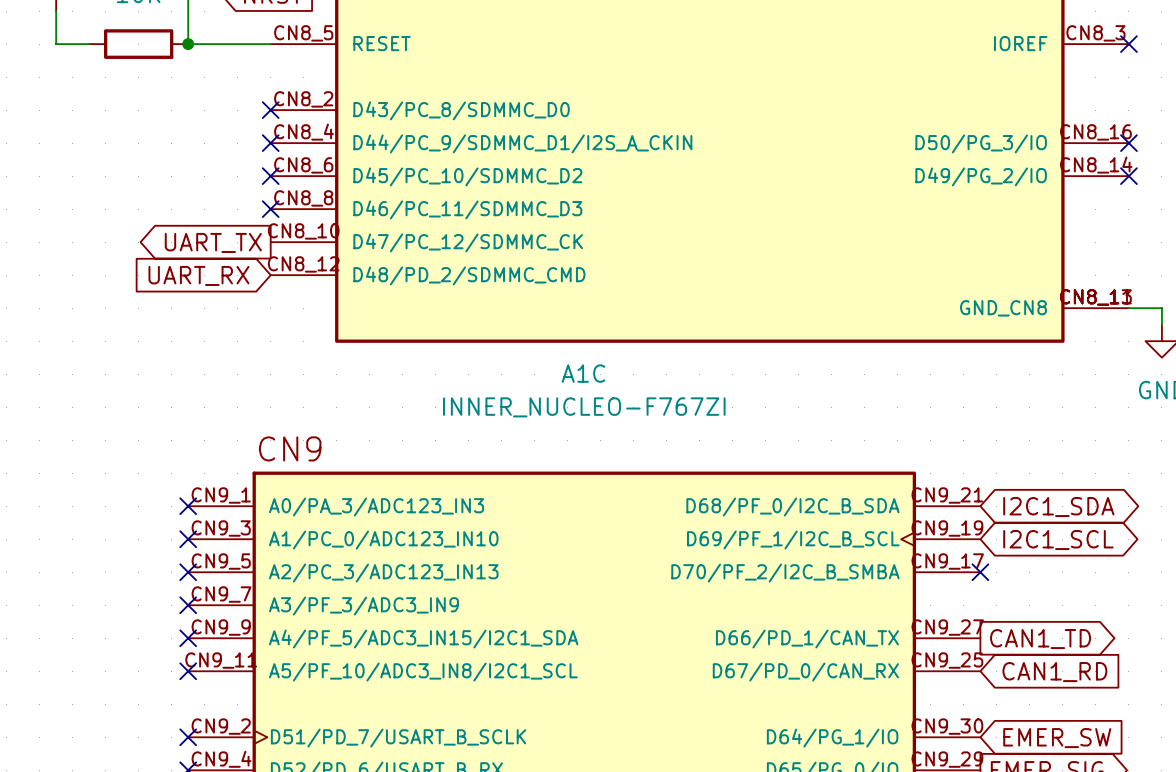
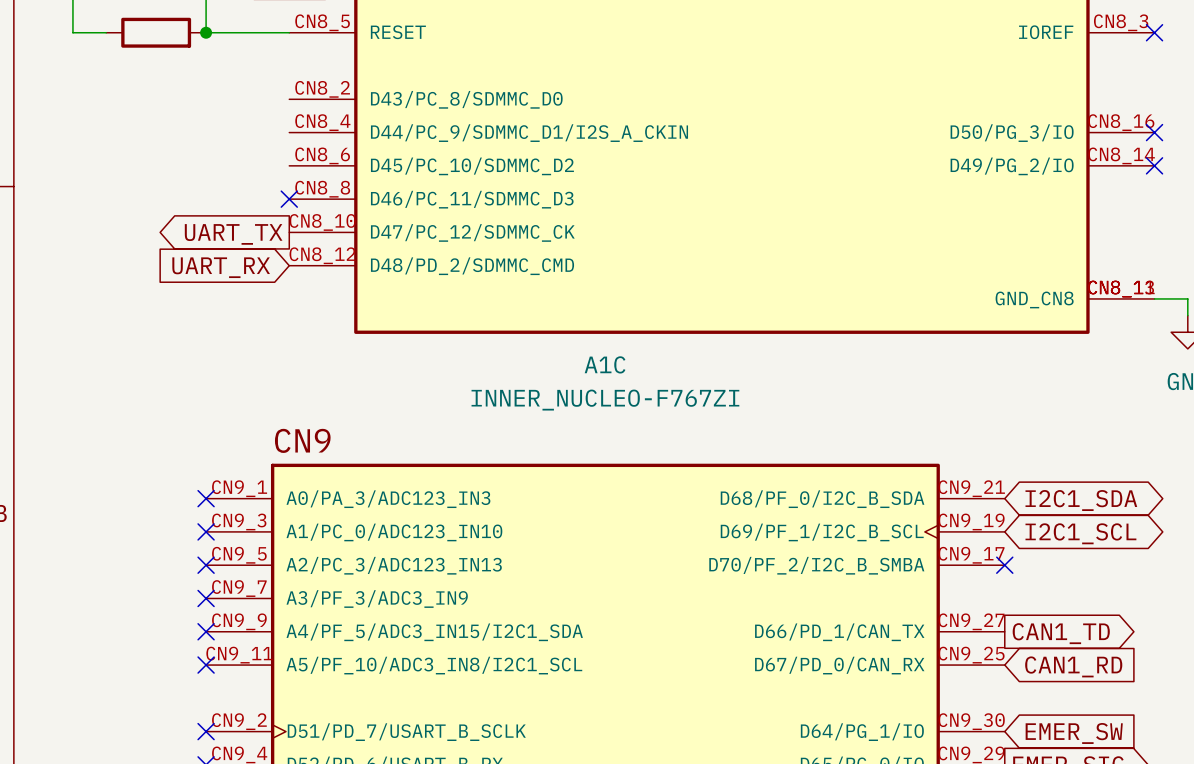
no-connect mark: (270, 110) -> none
no-connect mark: (270, 143) -> none
no-connect mark: (270, 176) -> none

